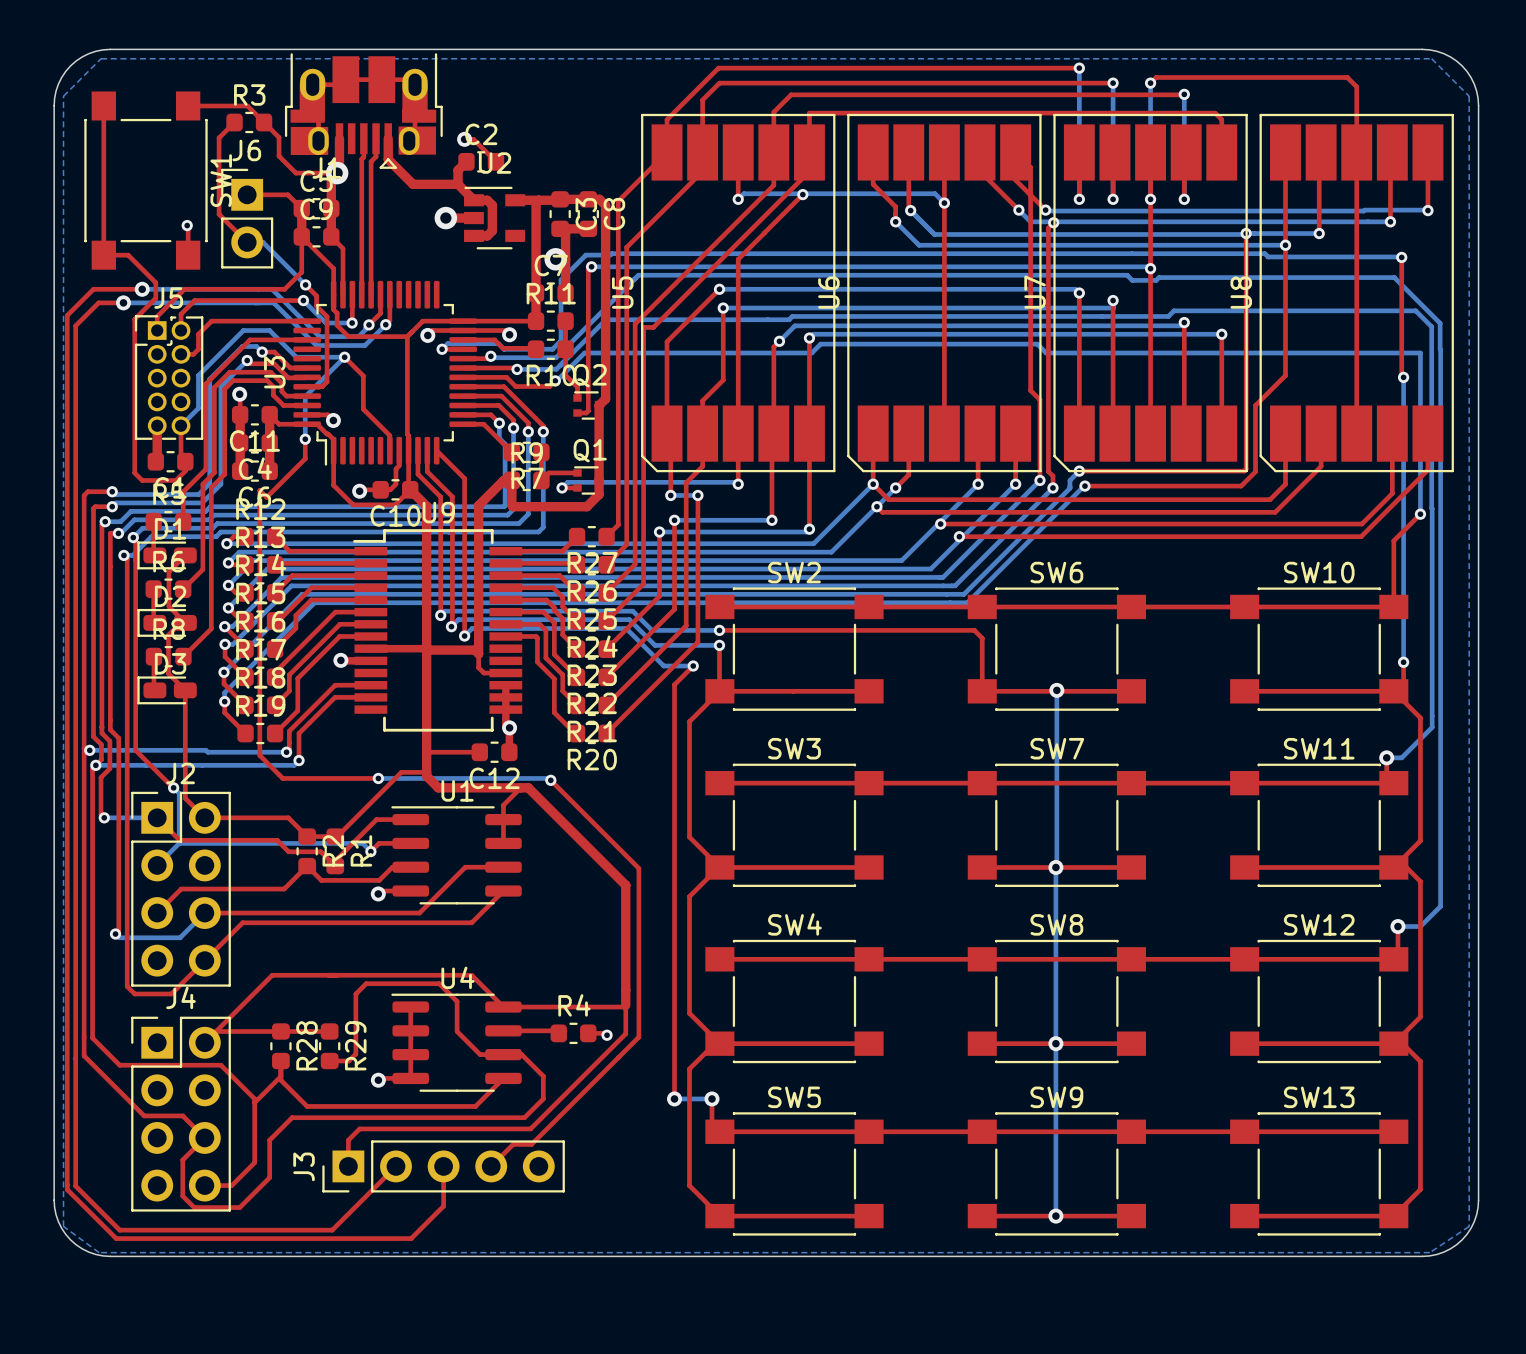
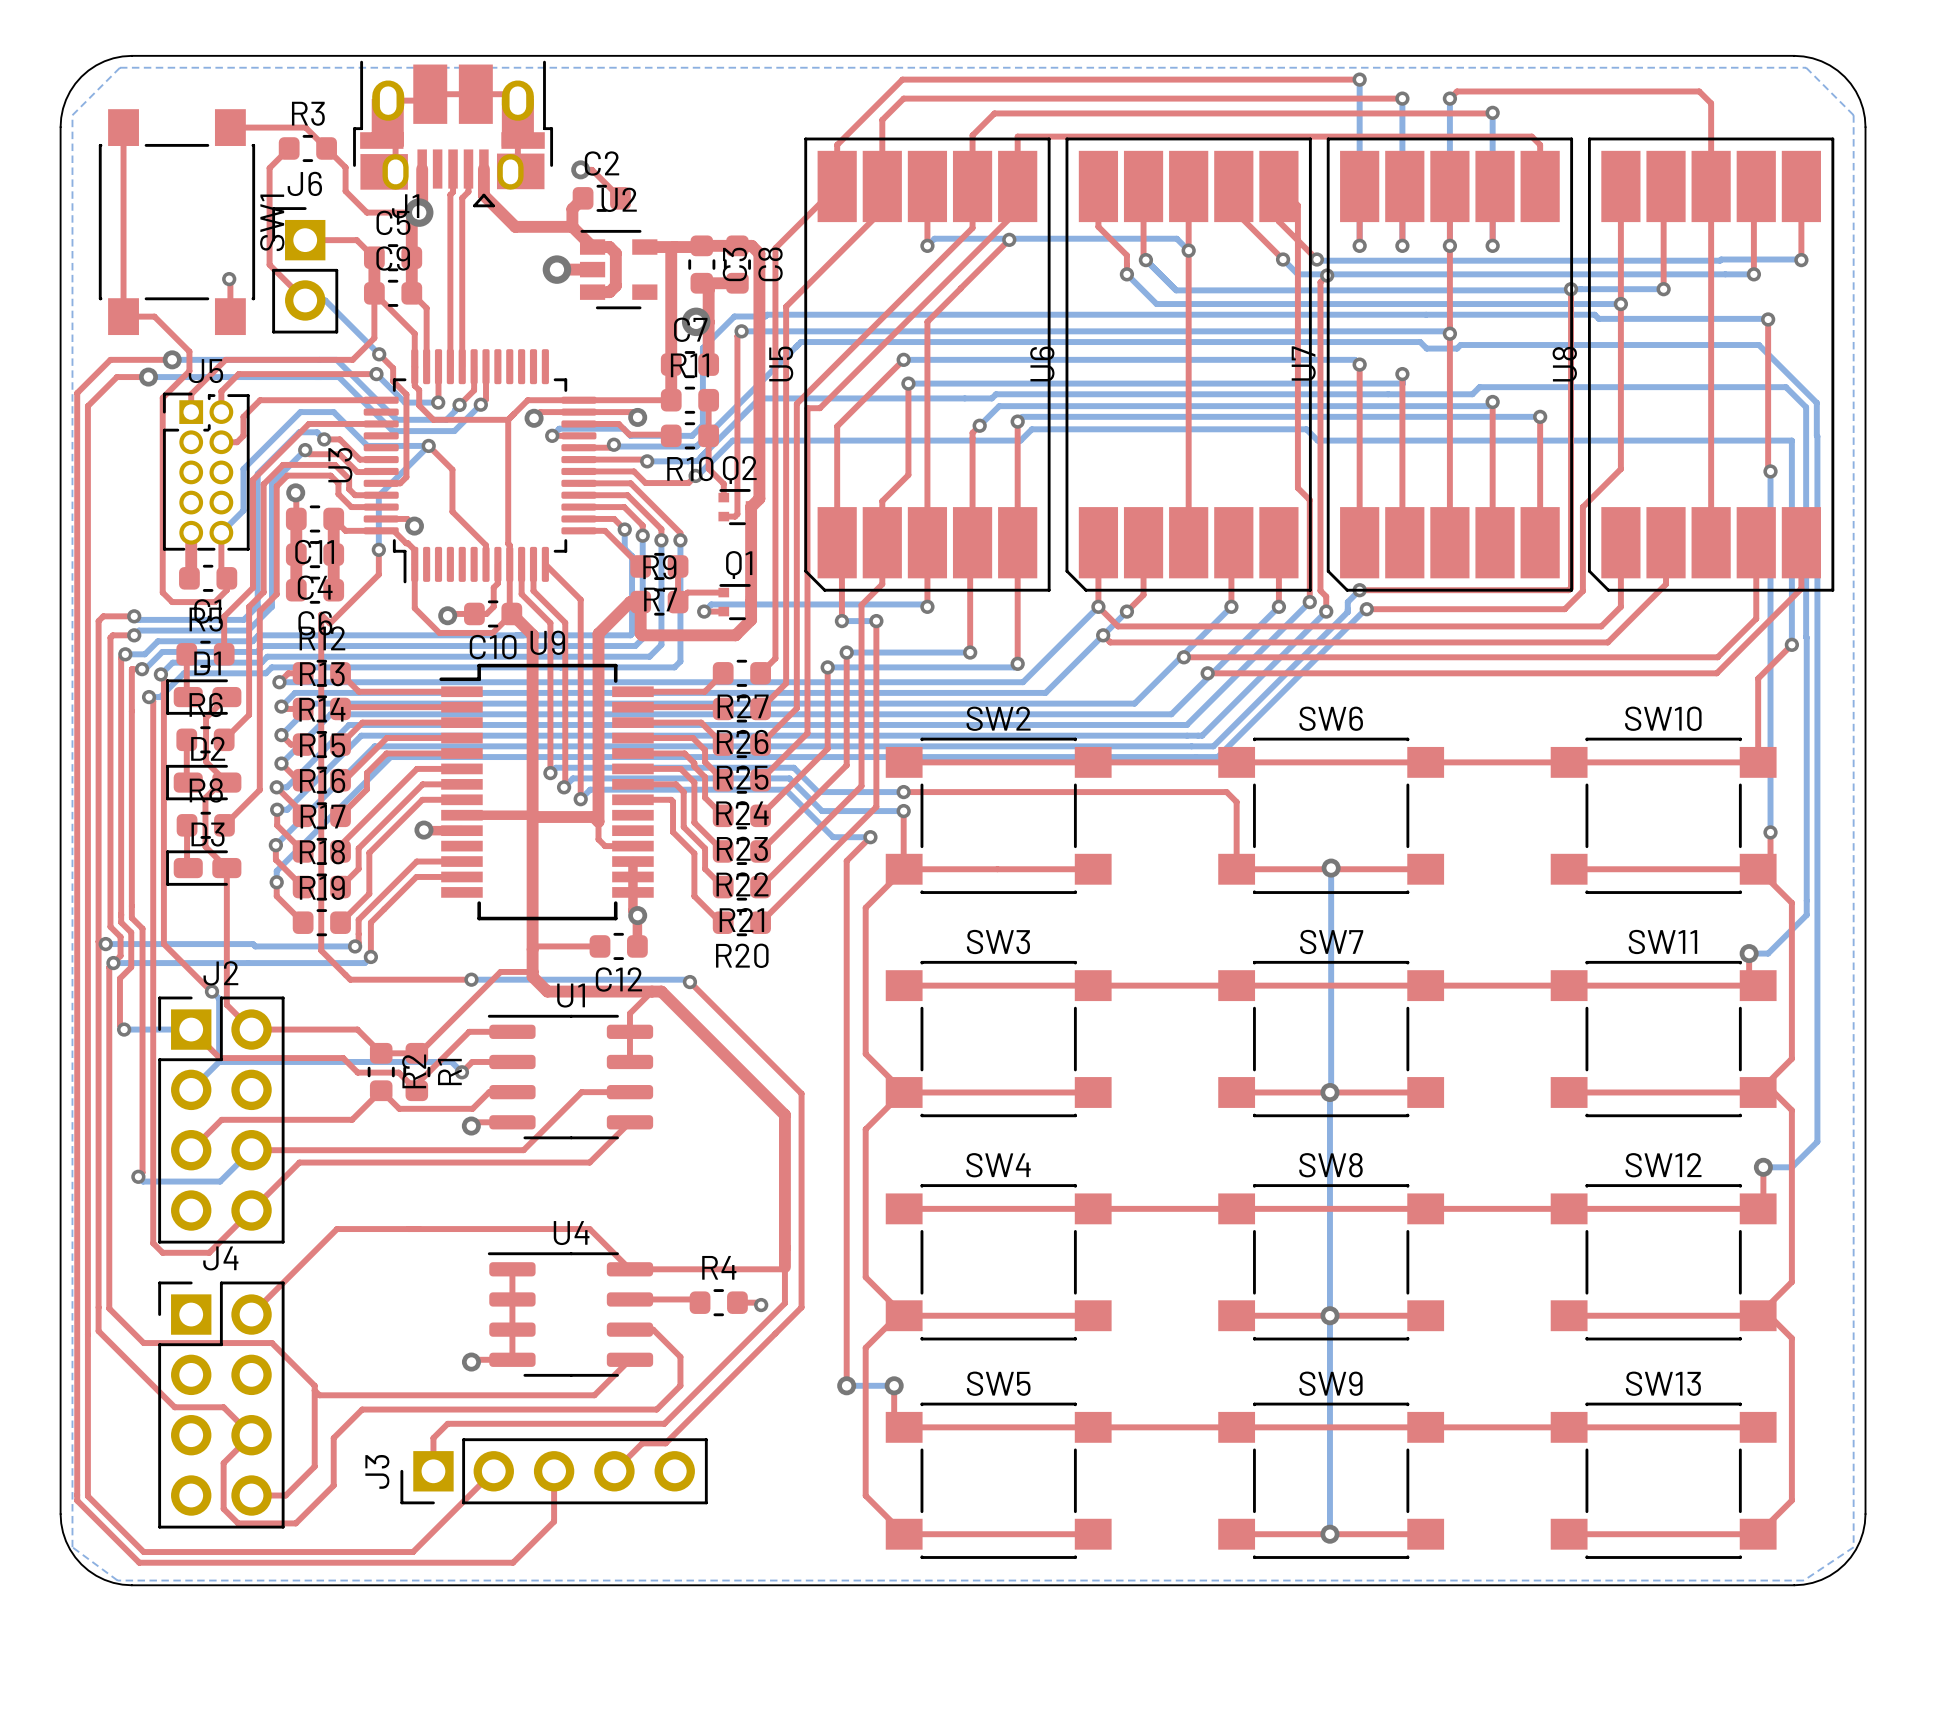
top track: (216, 1031) (329, 1031) -> none
R28: (280, 1046) -> none
R29: (329, 1046) -> none
top track: (503, 1054) (480, 1054) (457, 1031) (457, 1001) (439, 983) (366, 983) (355, 994) (355, 1053) (348, 1061) (329, 1061) -> none
top track: (280, 1061) (280, 1080) (307, 1106) -> none
top track: (280, 1076) (254, 1102) -> (381, 1395) (319, 1395) (314, 1390)

